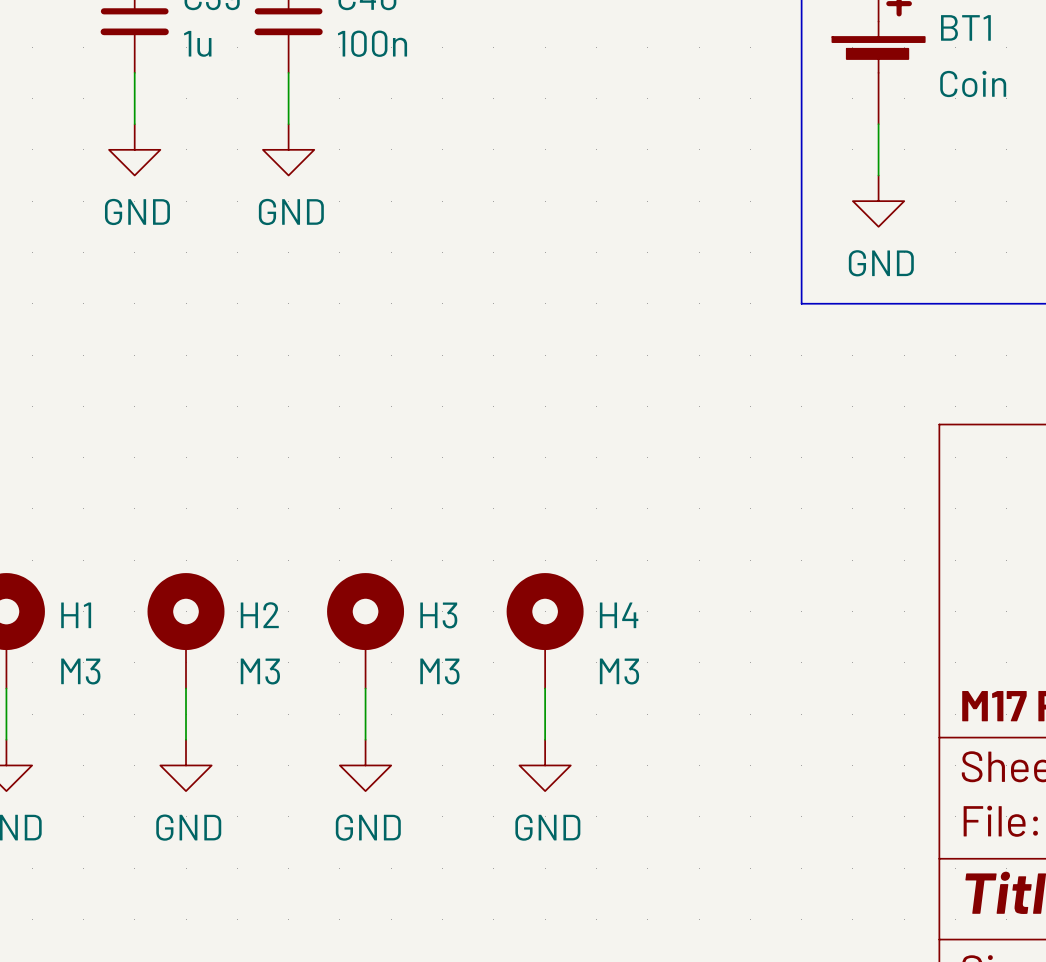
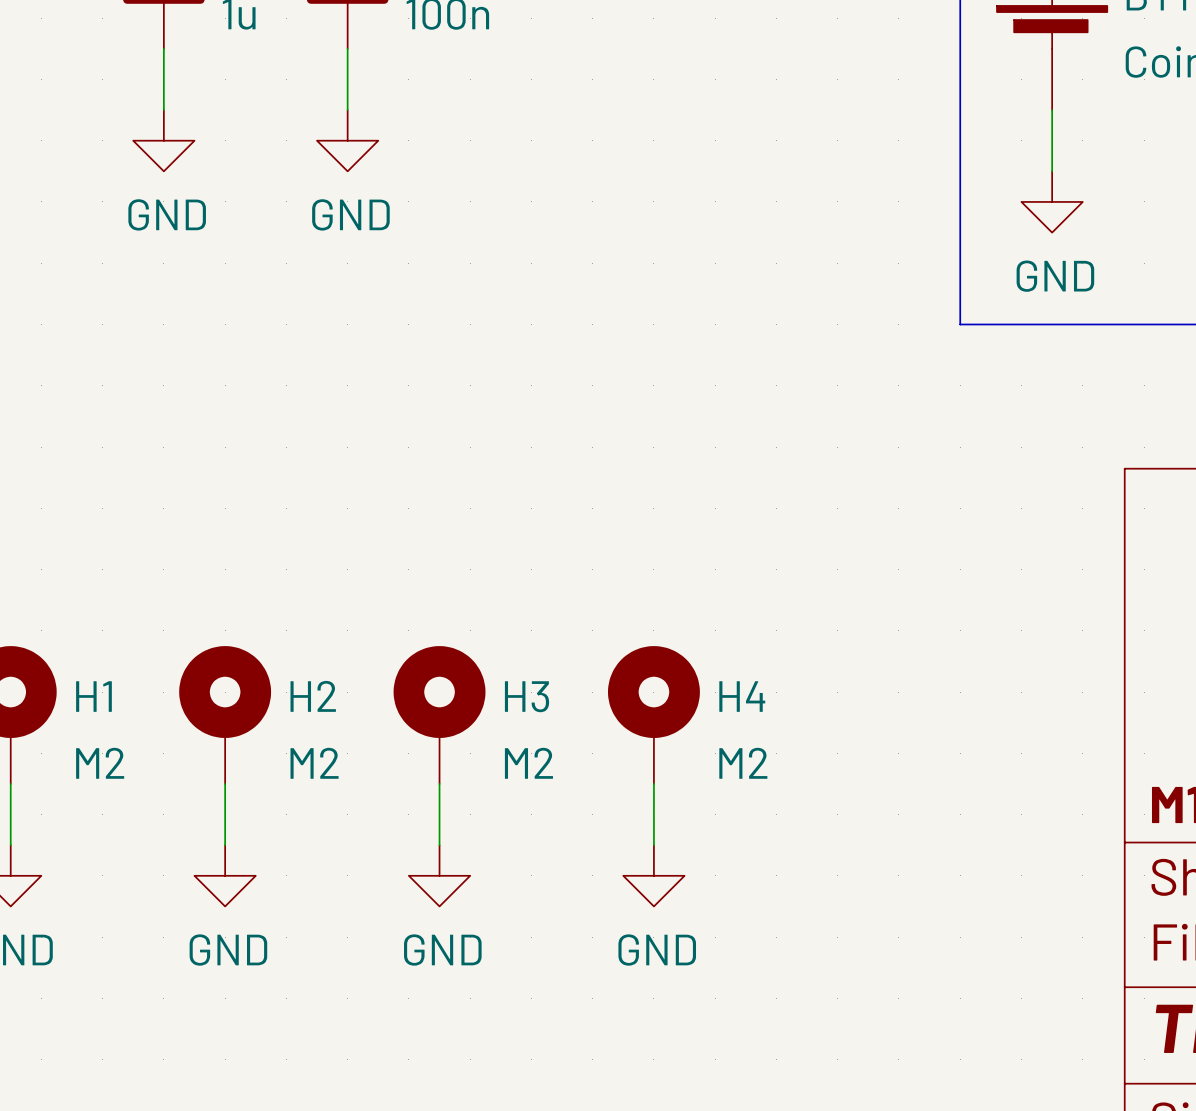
H1 value: M3 (80, 671) -> M2 (100, 763)
H2 value: M3 (260, 671) -> M2 (314, 763)
H3 value: M3 (439, 671) -> M2 (528, 763)
H4 value: M3 (619, 671) -> M2 (743, 763)

